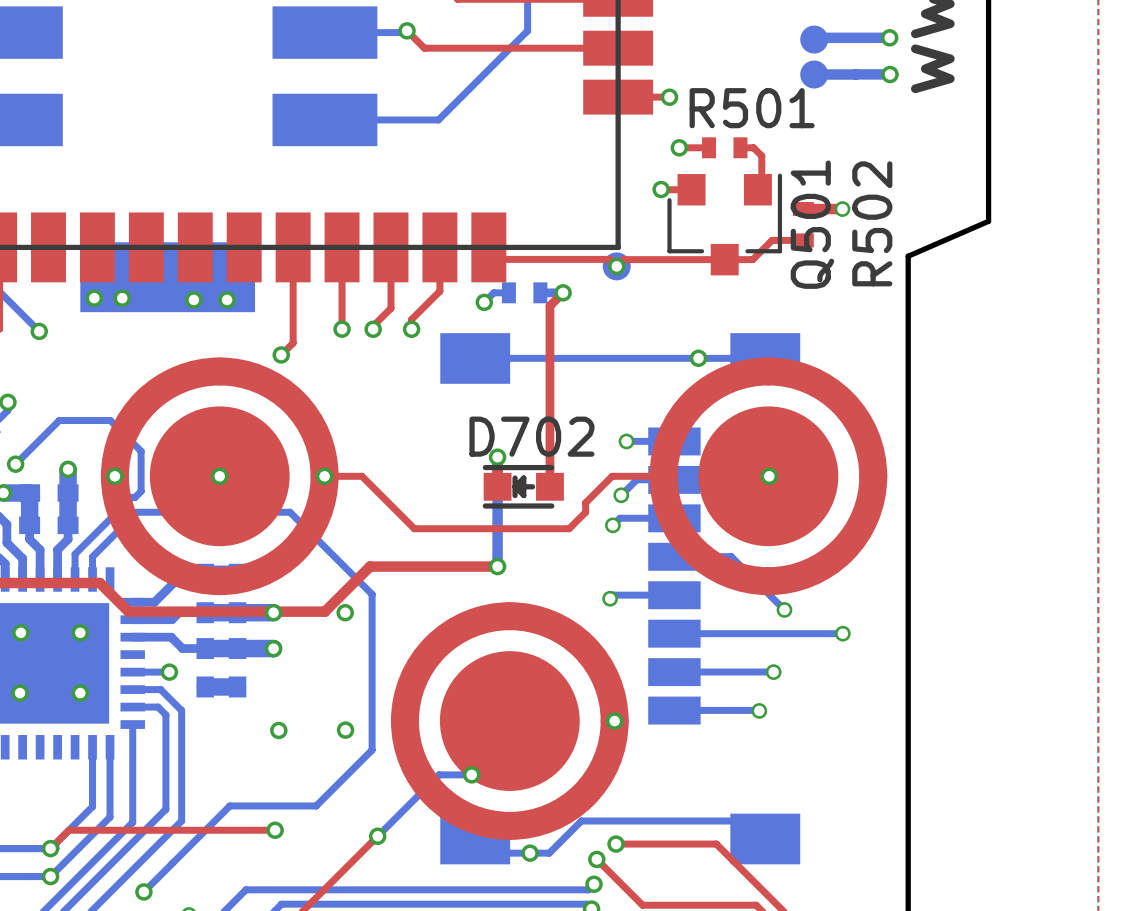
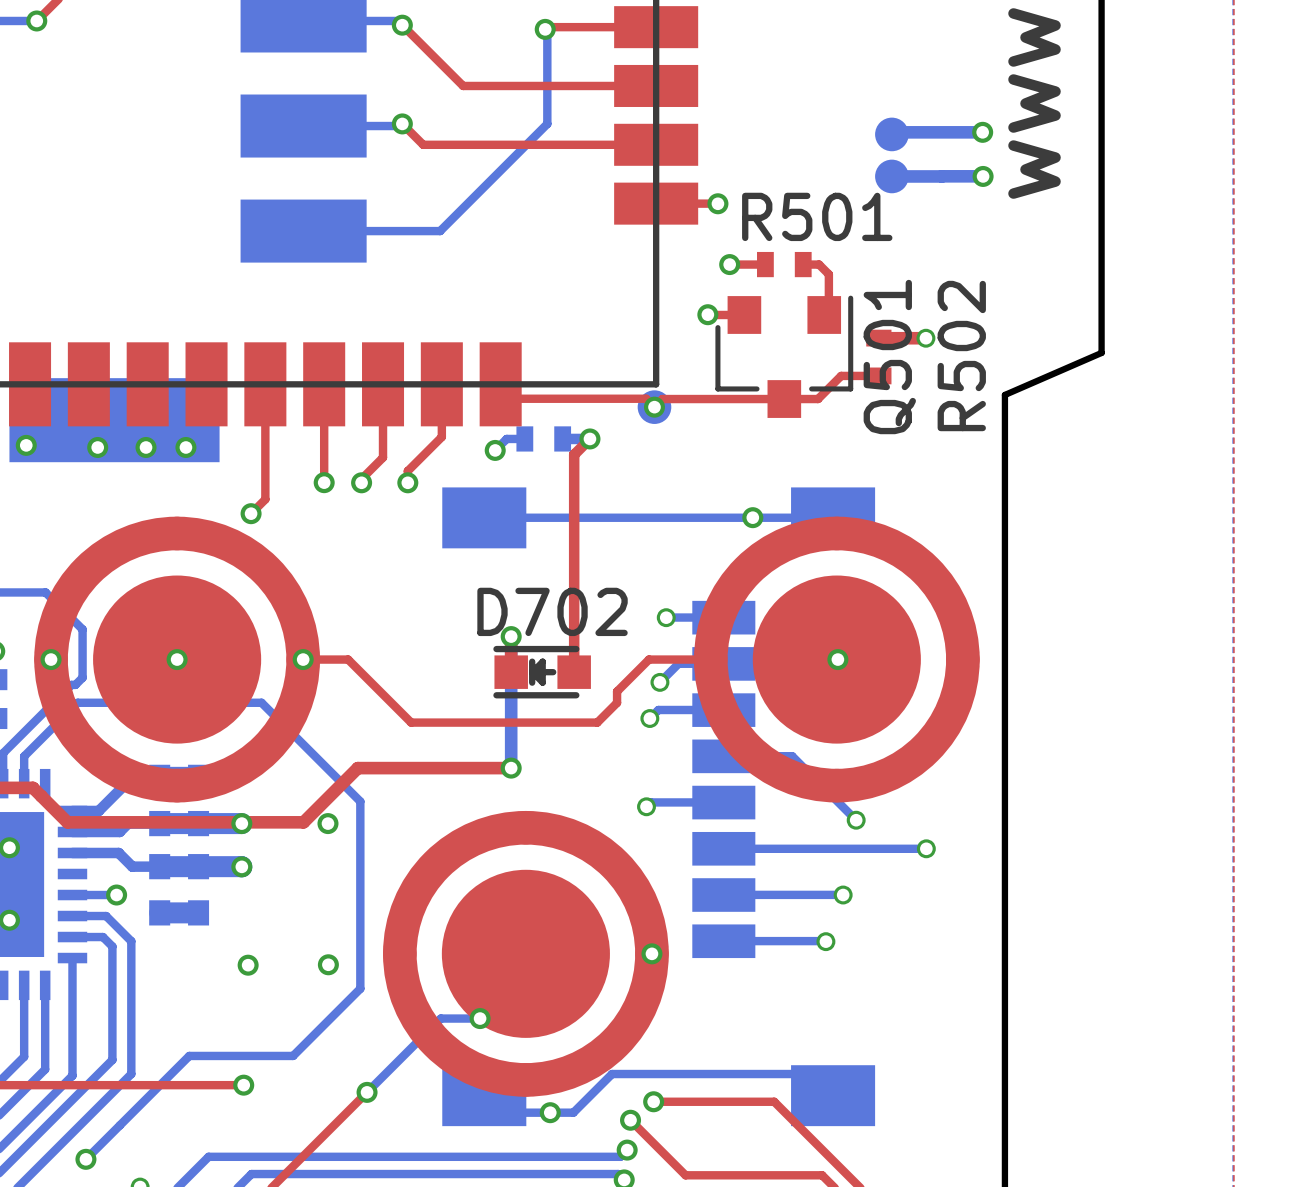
via position: (122, 298) -> (97, 447)

